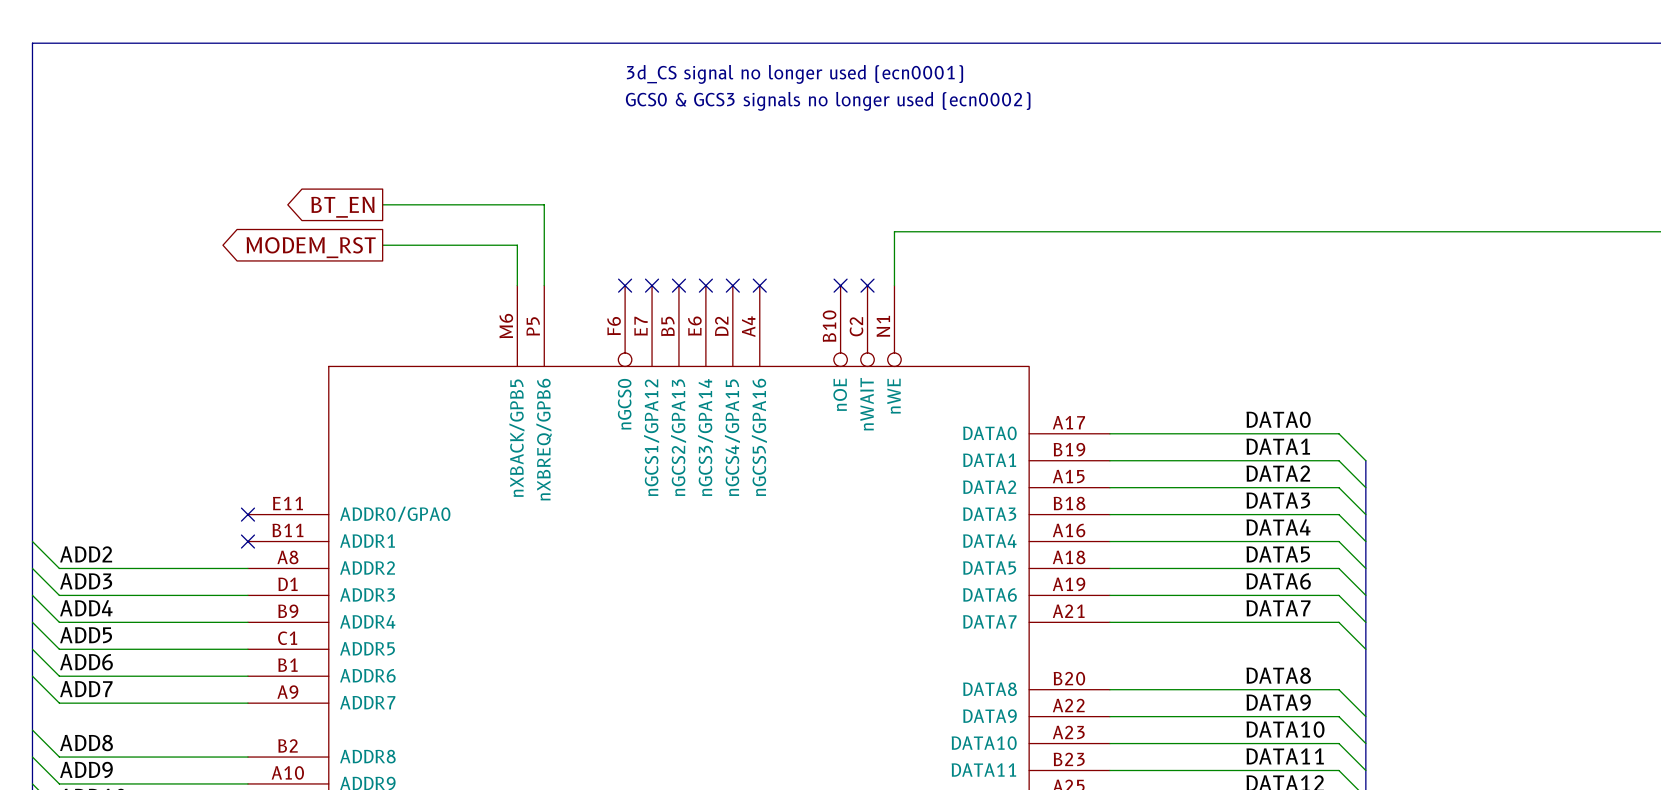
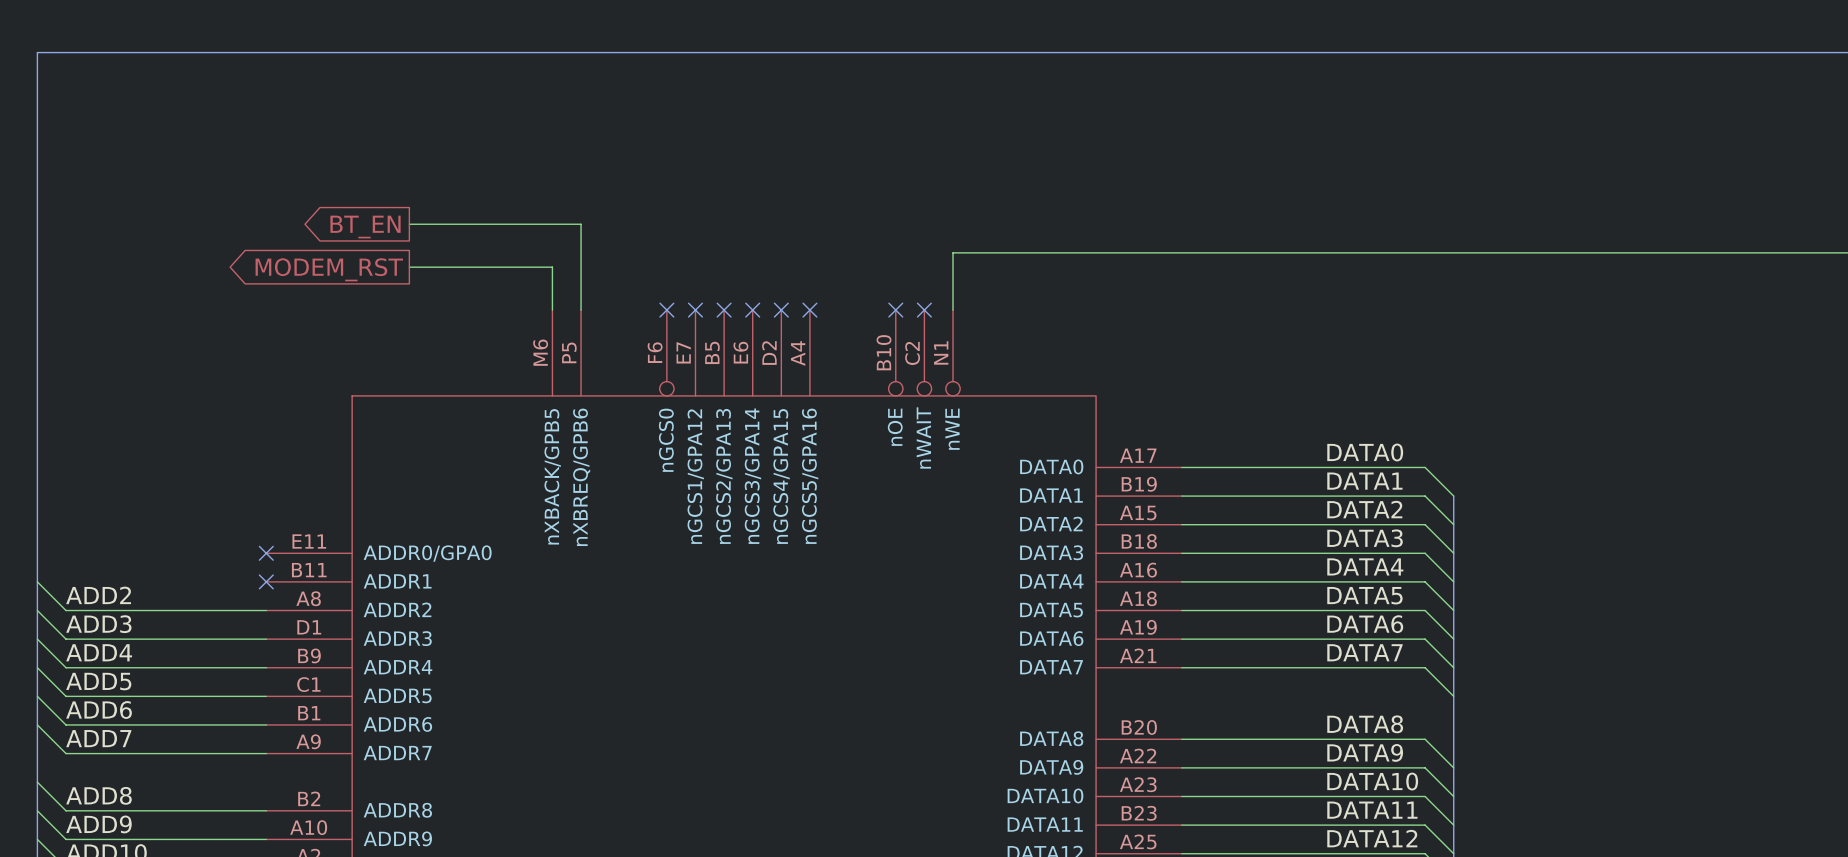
text: 3d_CS signal no longer used (ecn0001) (794, 74) -> none
text: GCS0 & GCS3 signals no longer used (ecn0002) (828, 101) -> none

